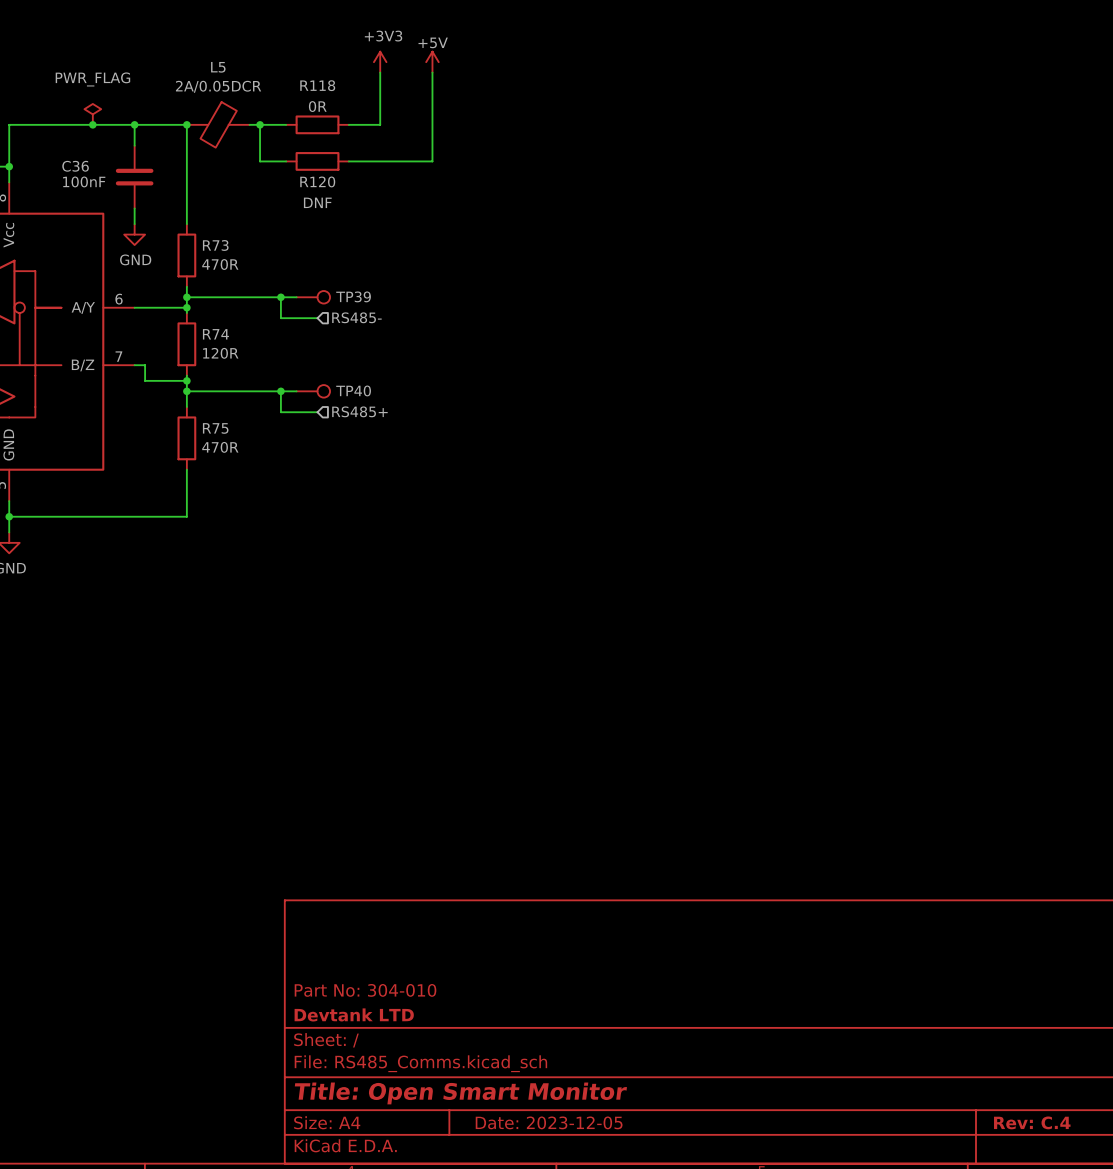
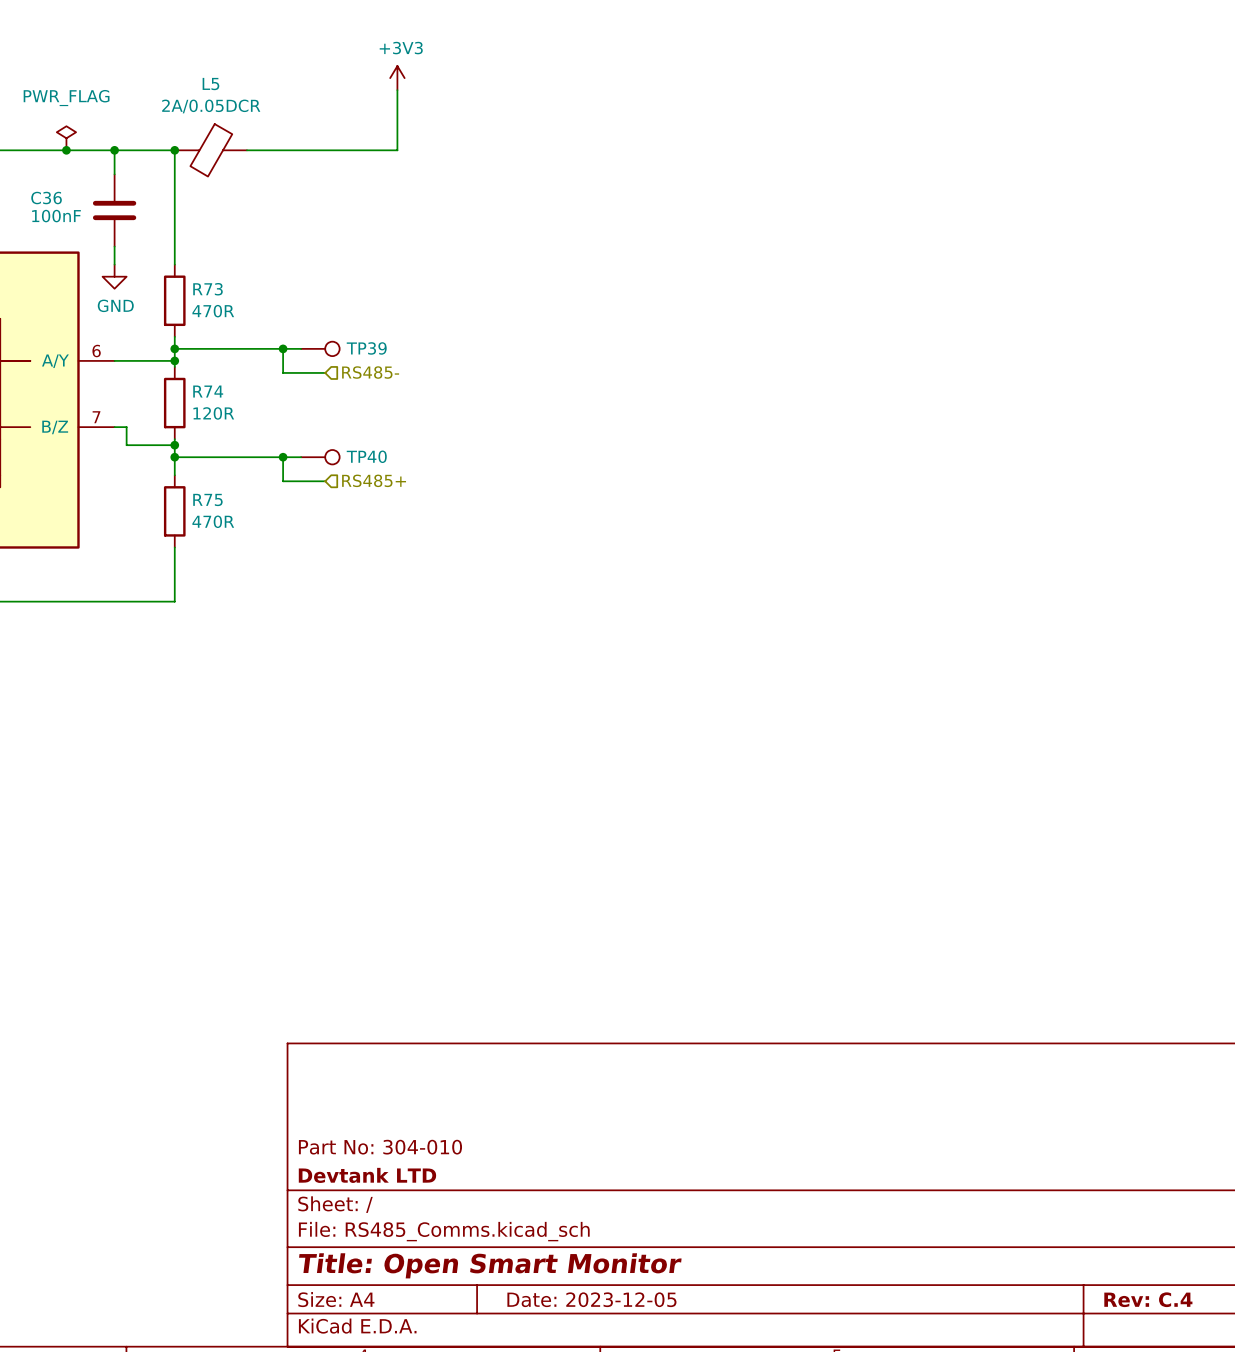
power symbol: +5V (432, 62) -> none
wire: (432, 72) (432, 161) (348, 161) -> none
wire: (260, 124) (260, 161) (286, 161) -> none
junction: (260, 124) -> none
wire: none -> (289, 150) (361, 150)
R118: 0R (317, 124) -> none
R120: DNF (317, 161) -> none

